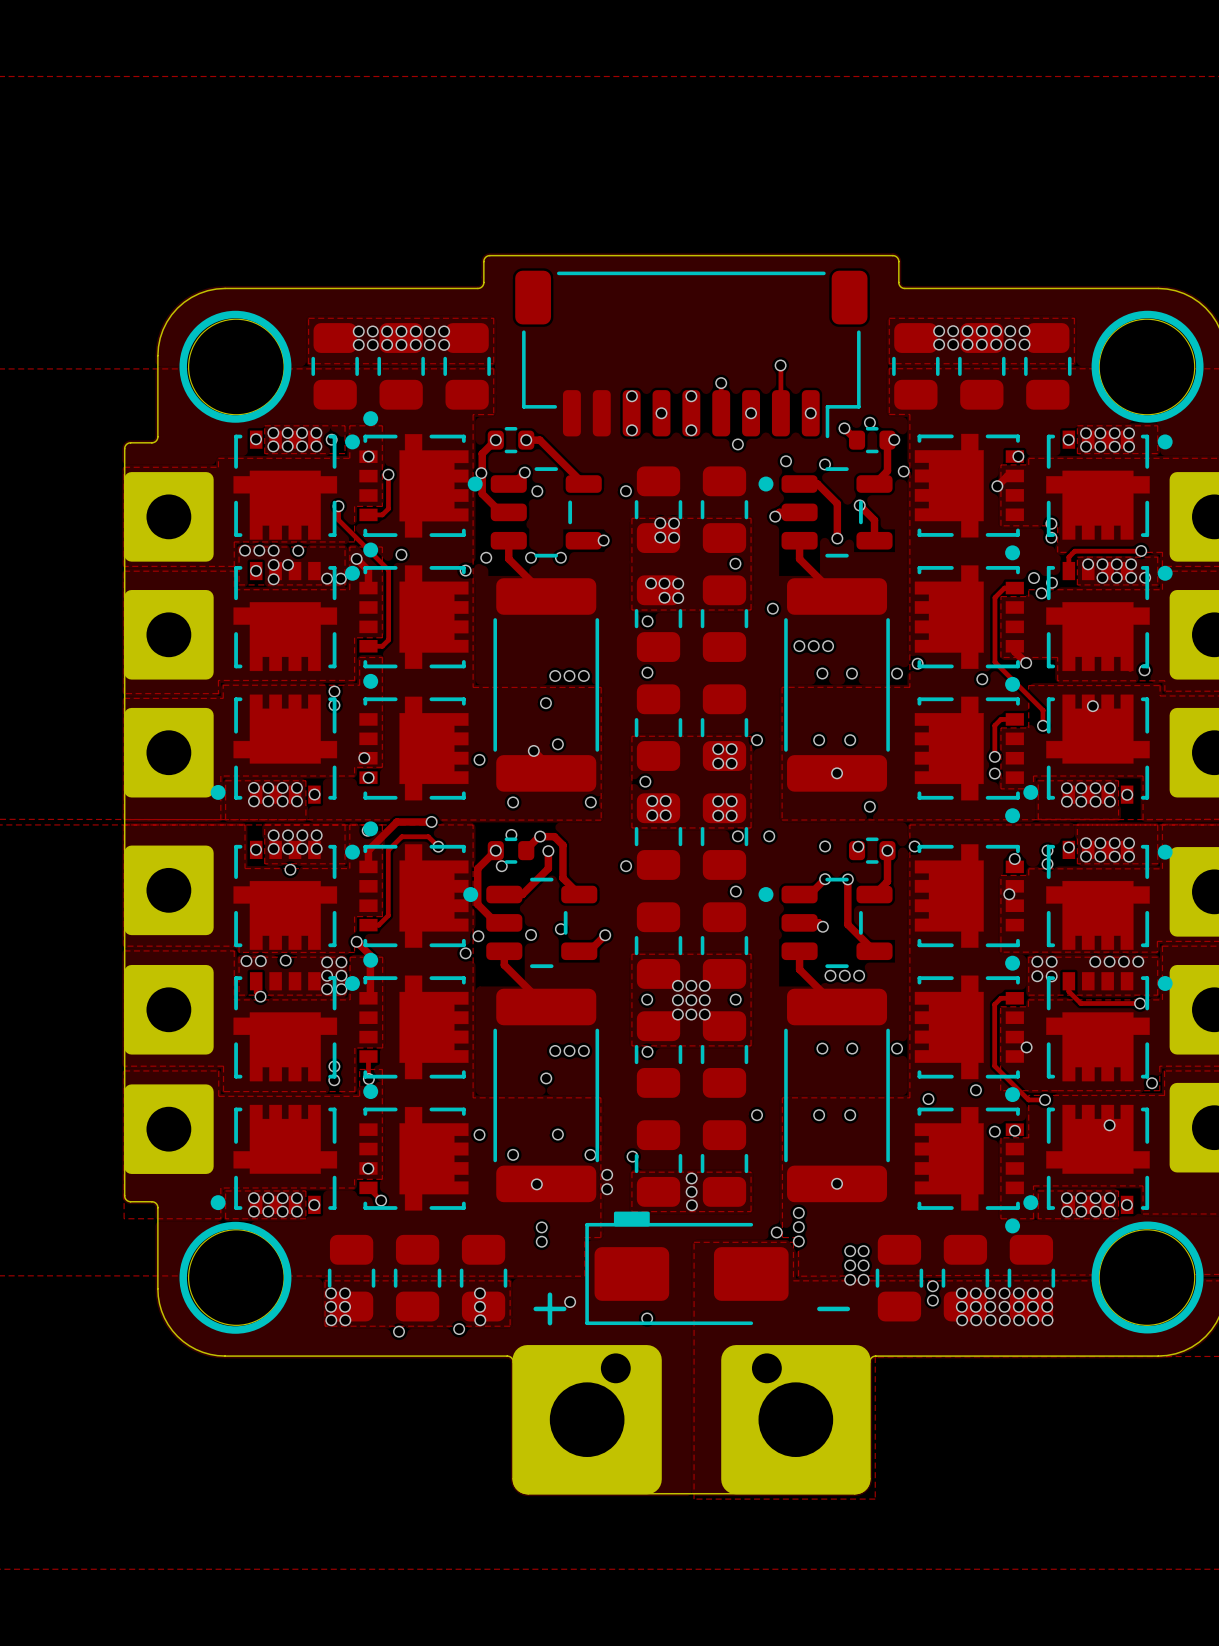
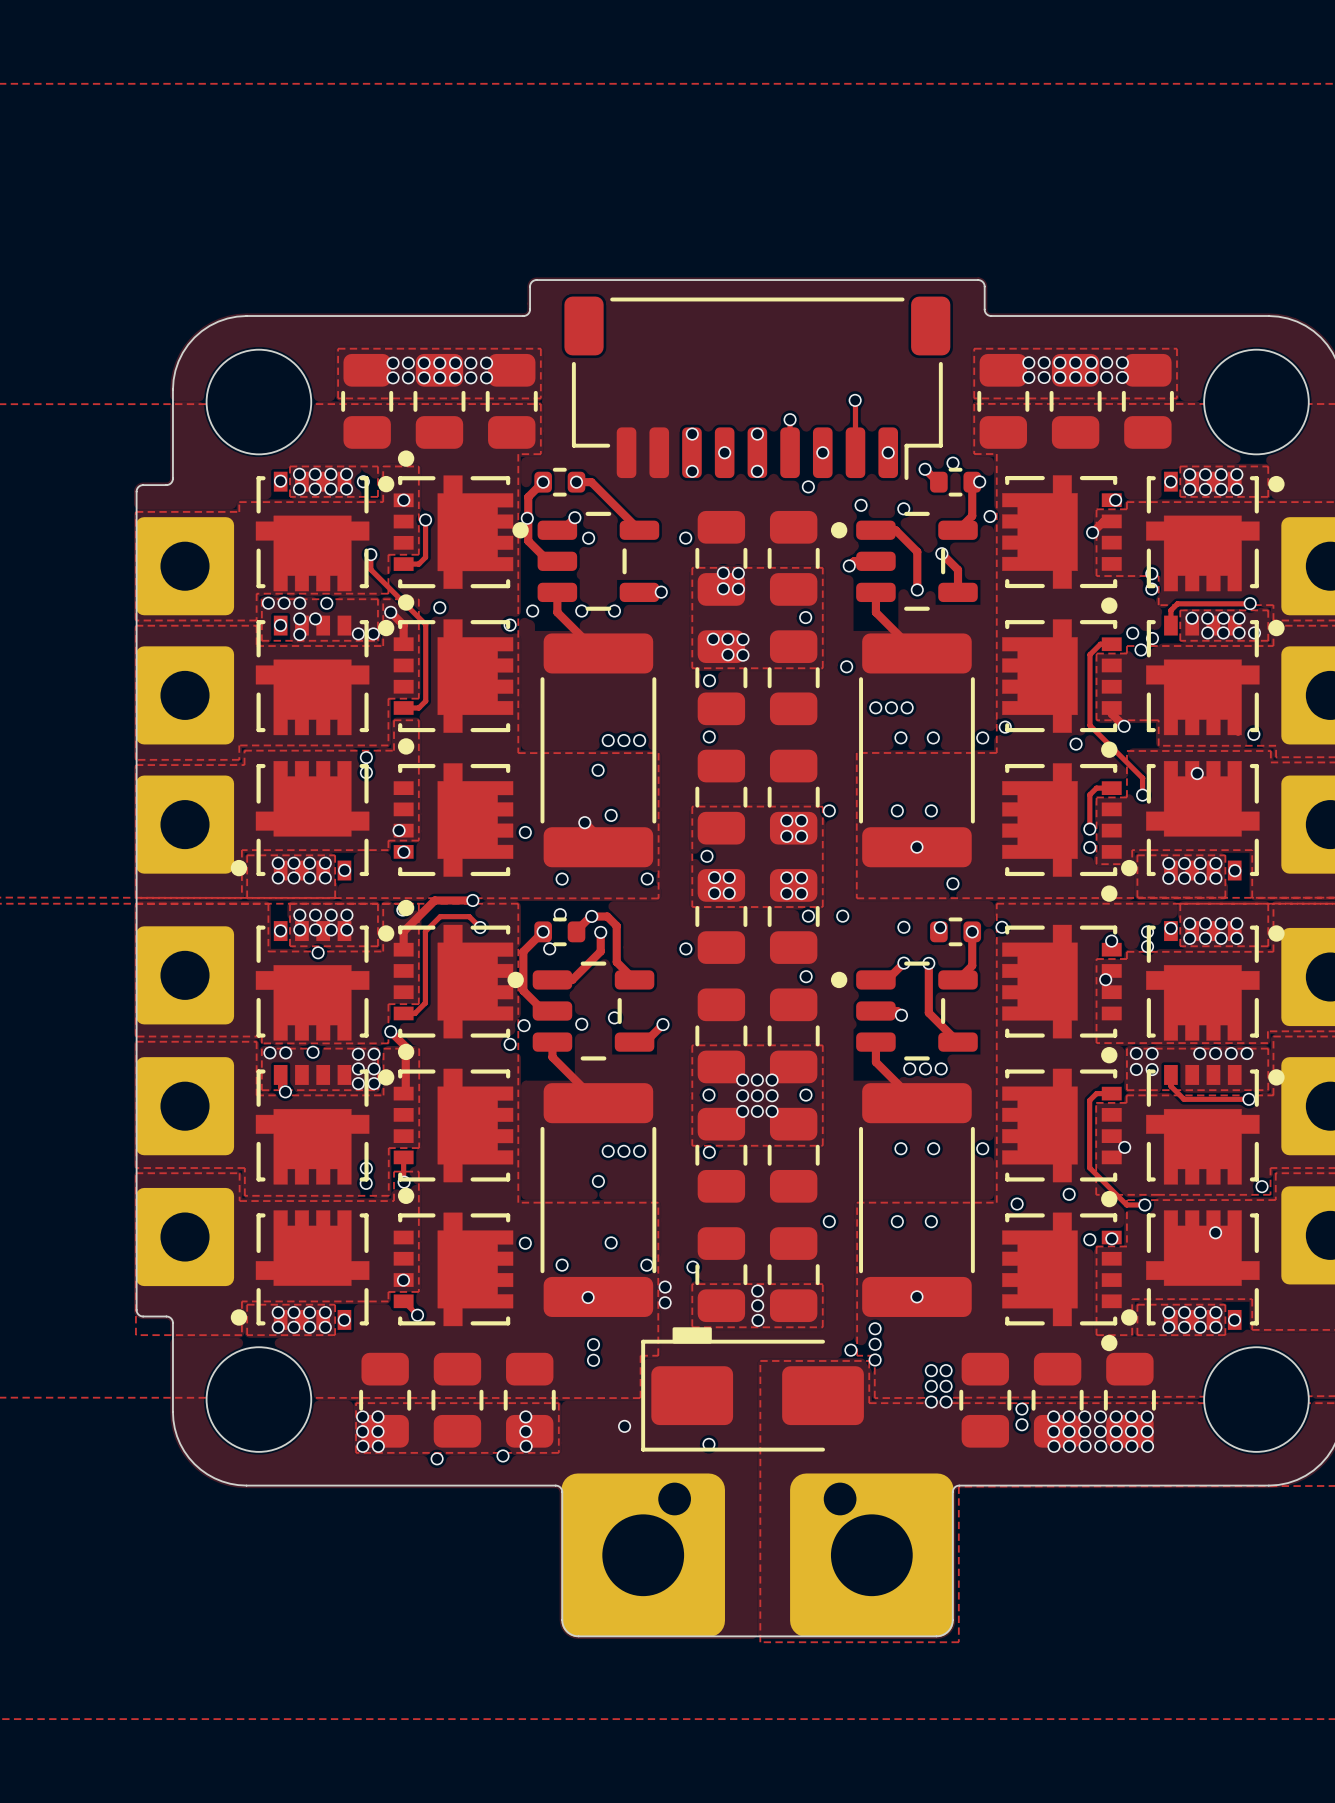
drawing: [179, 310, 292, 423] -> none
drawing: [1091, 310, 1204, 423] -> none
drawing: [179, 1221, 292, 1334] -> none
drawing: [1091, 1221, 1204, 1334] -> none
text: + (549, 1308) -> none
text: - (833, 1308) -> none

